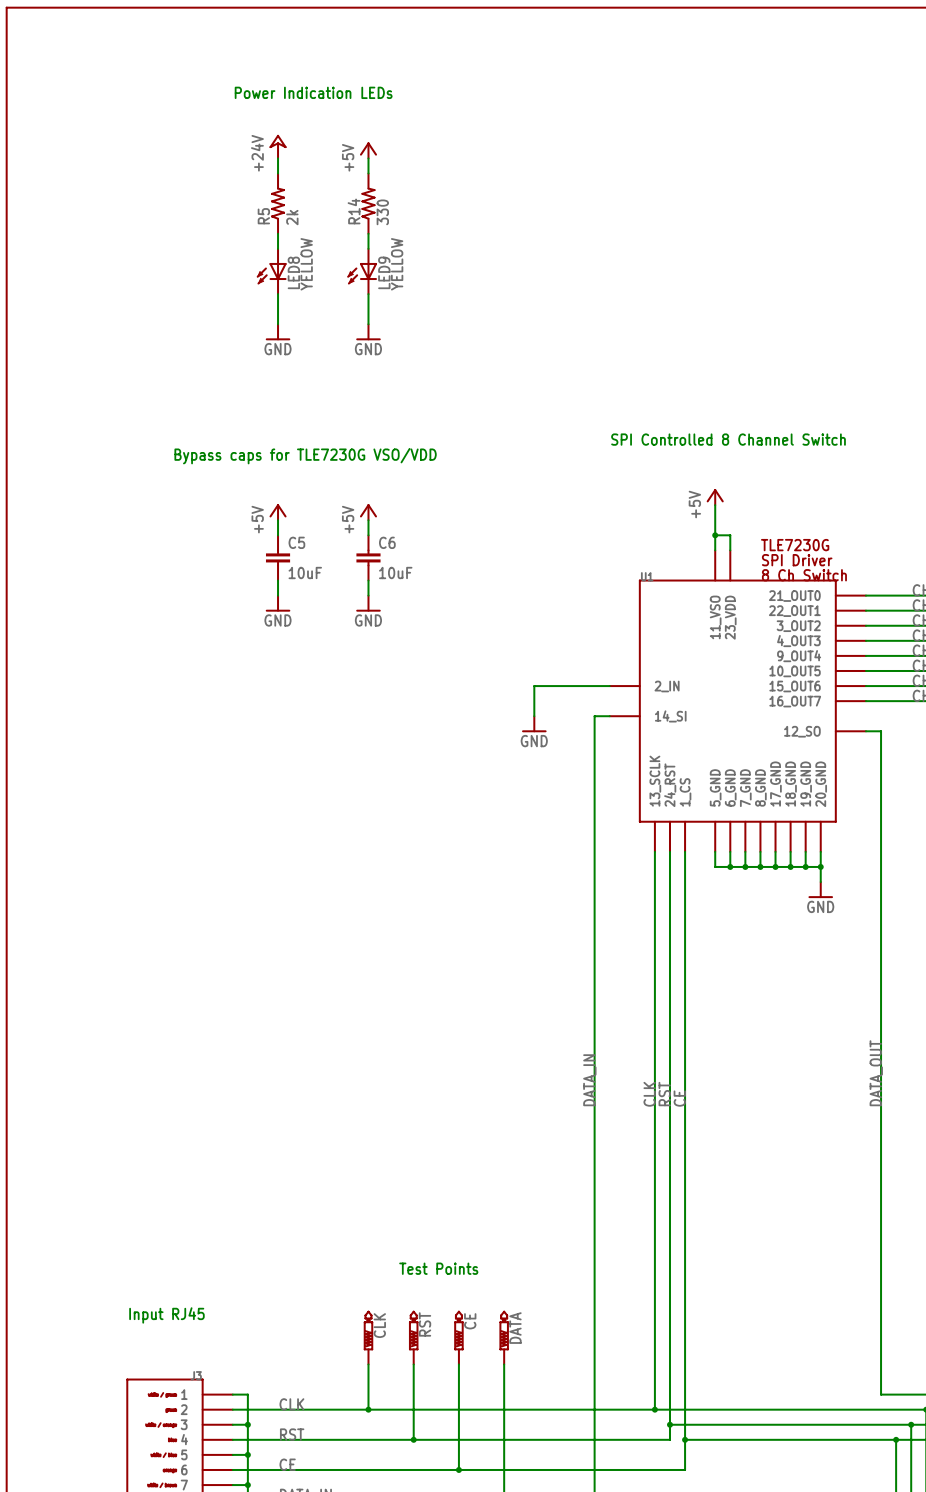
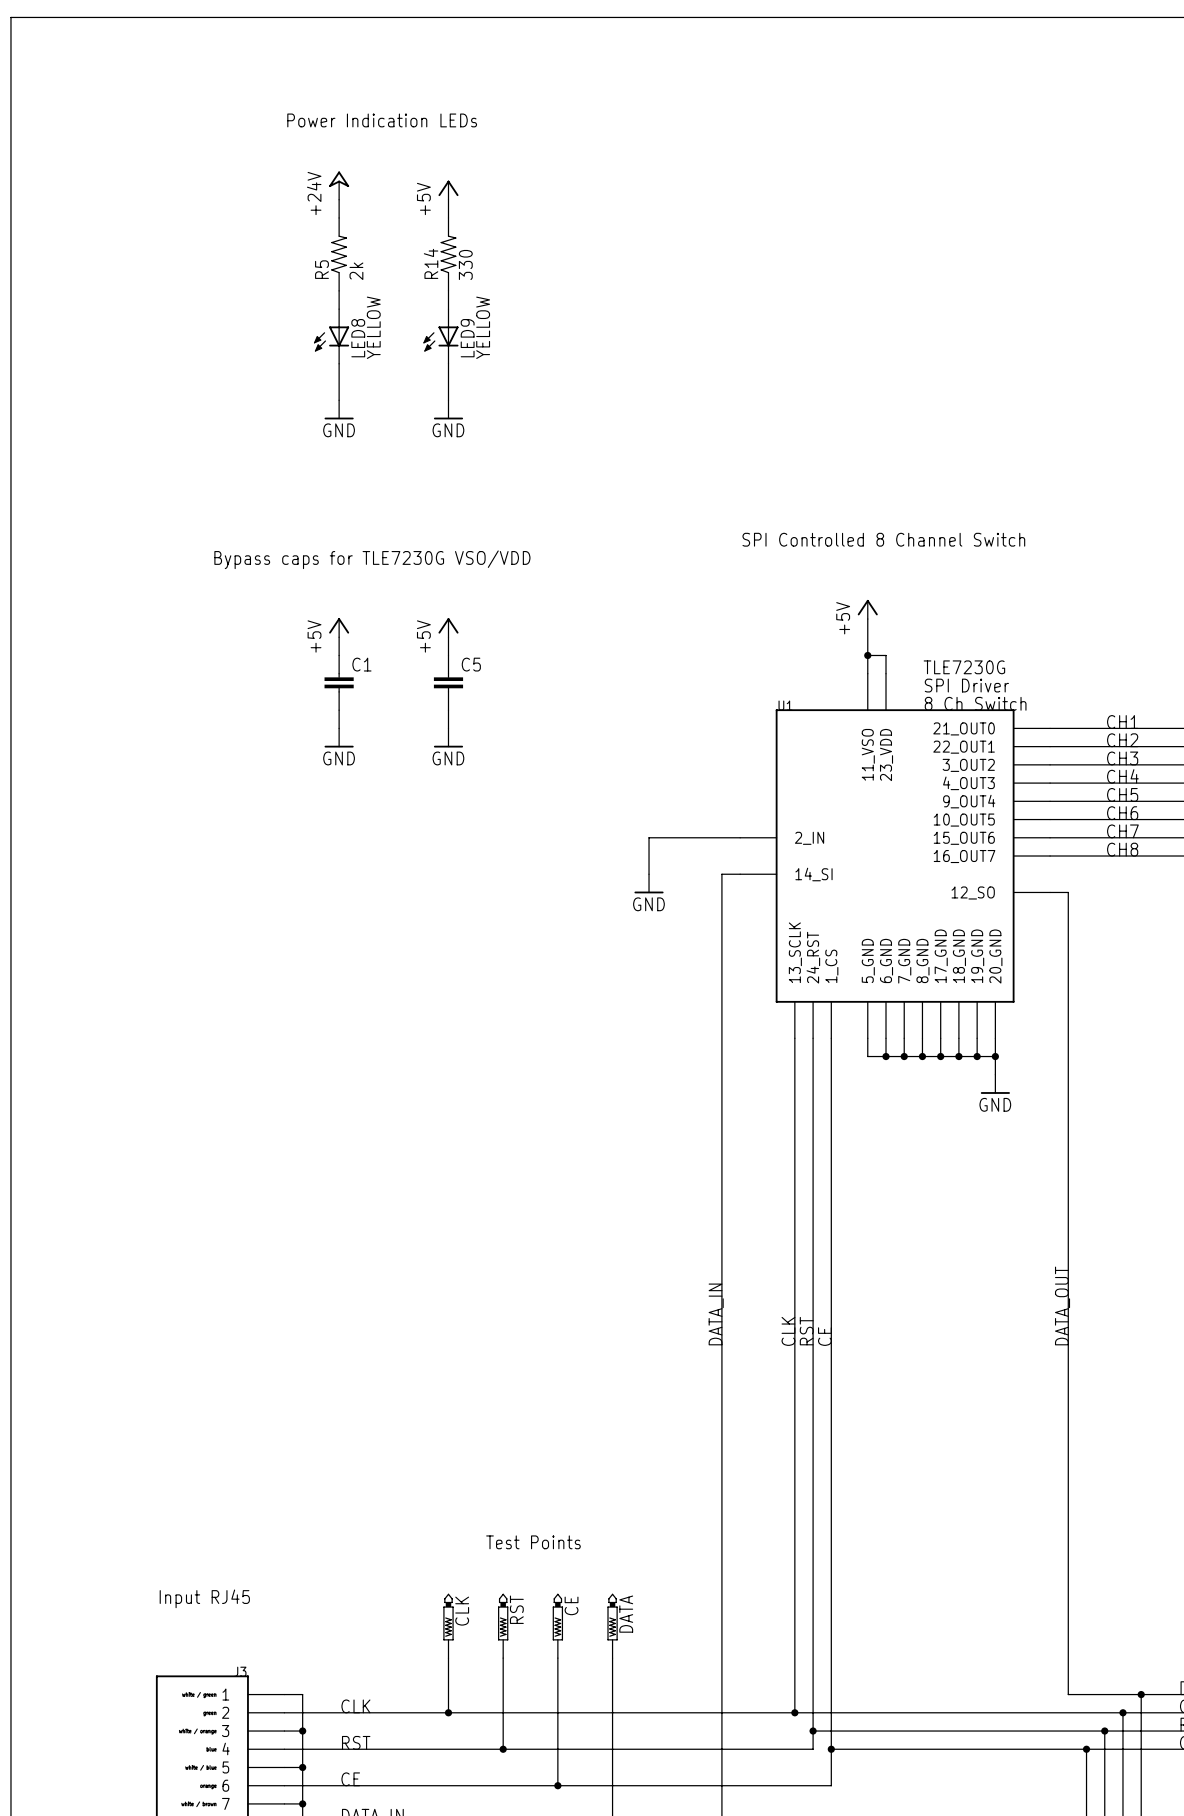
C5 name: C5 (296, 542) -> C1 (361, 664)
C6 name: C6 (387, 542) -> C5 (471, 664)
C5 value: 10uF (305, 572) -> none
C6 value: 10uF (395, 572) -> none

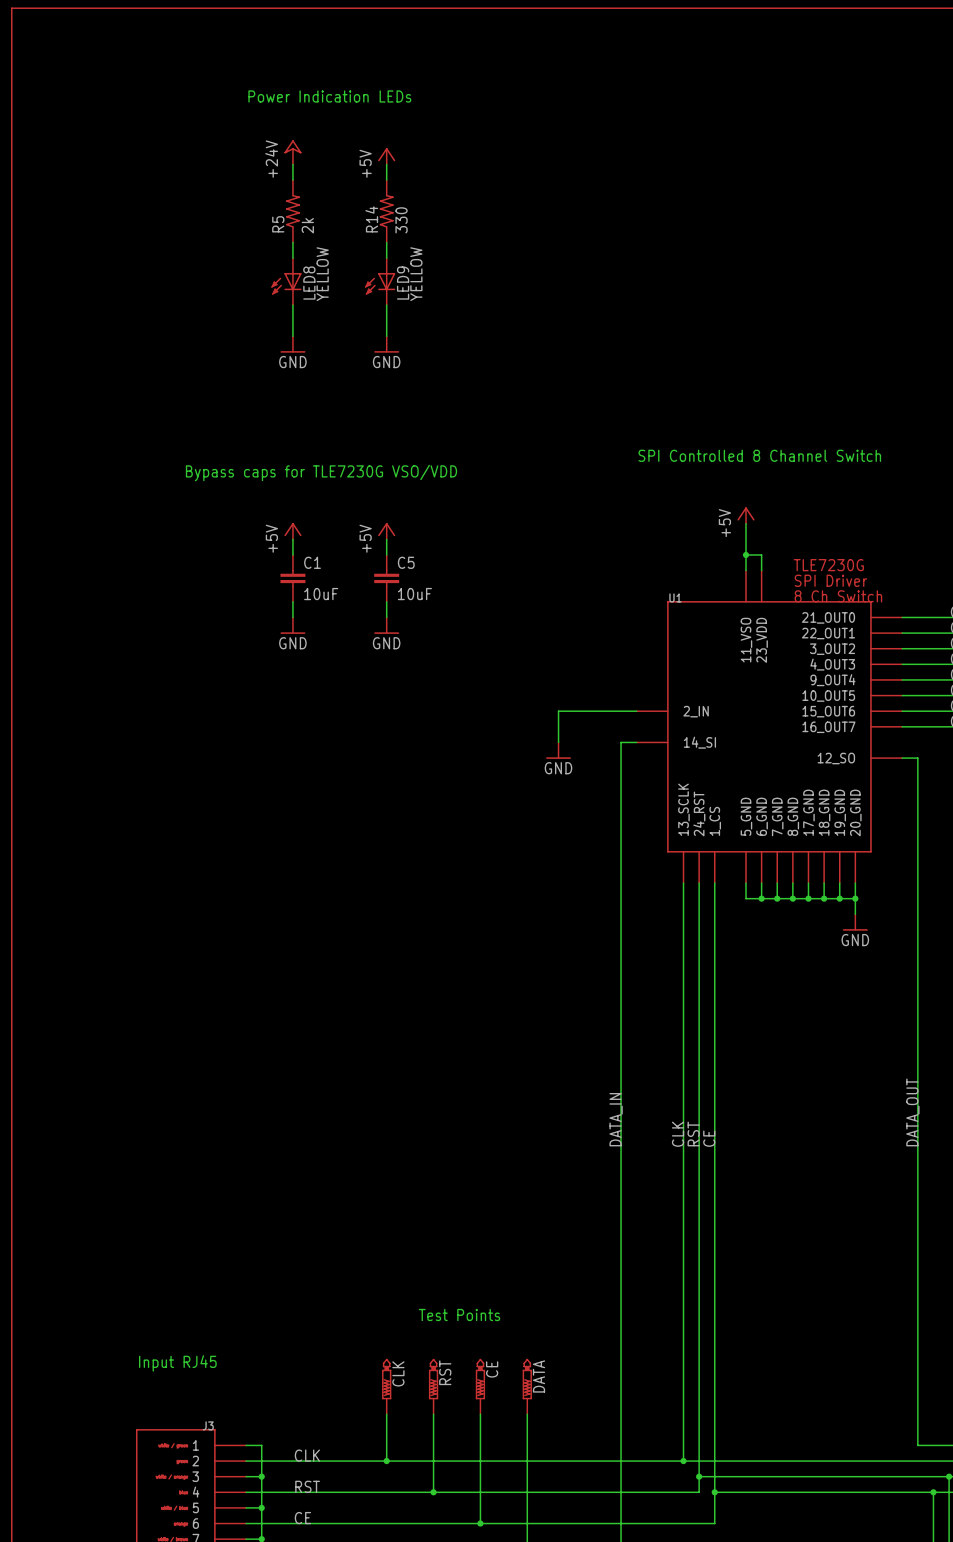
C1 value: none -> 10uF (321, 594)
C5 value: none -> 10uF (414, 594)

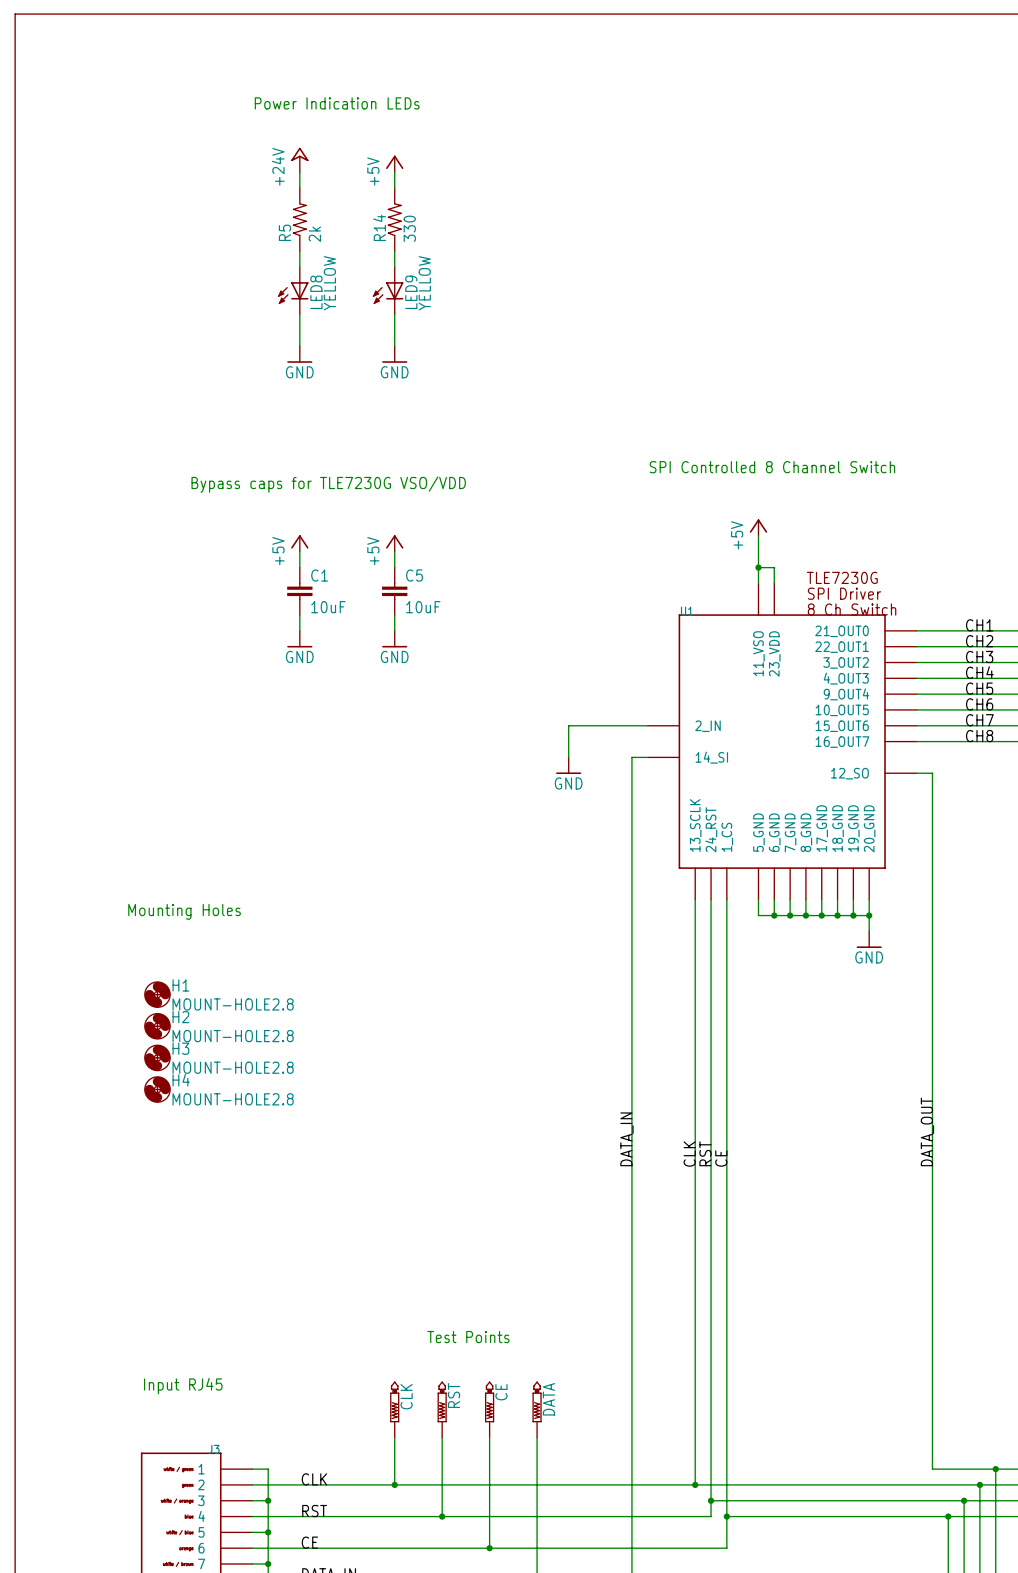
text: none -> Mounting Holes (184, 911)
H1: none -> MOUNT-HOLE2.8 (157, 994)
H2: none -> MOUNT-HOLE2.8 (157, 1026)
H3: none -> MOUNT-HOLE2.8 (157, 1057)
H4: none -> MOUNT-HOLE2.8 (157, 1089)

